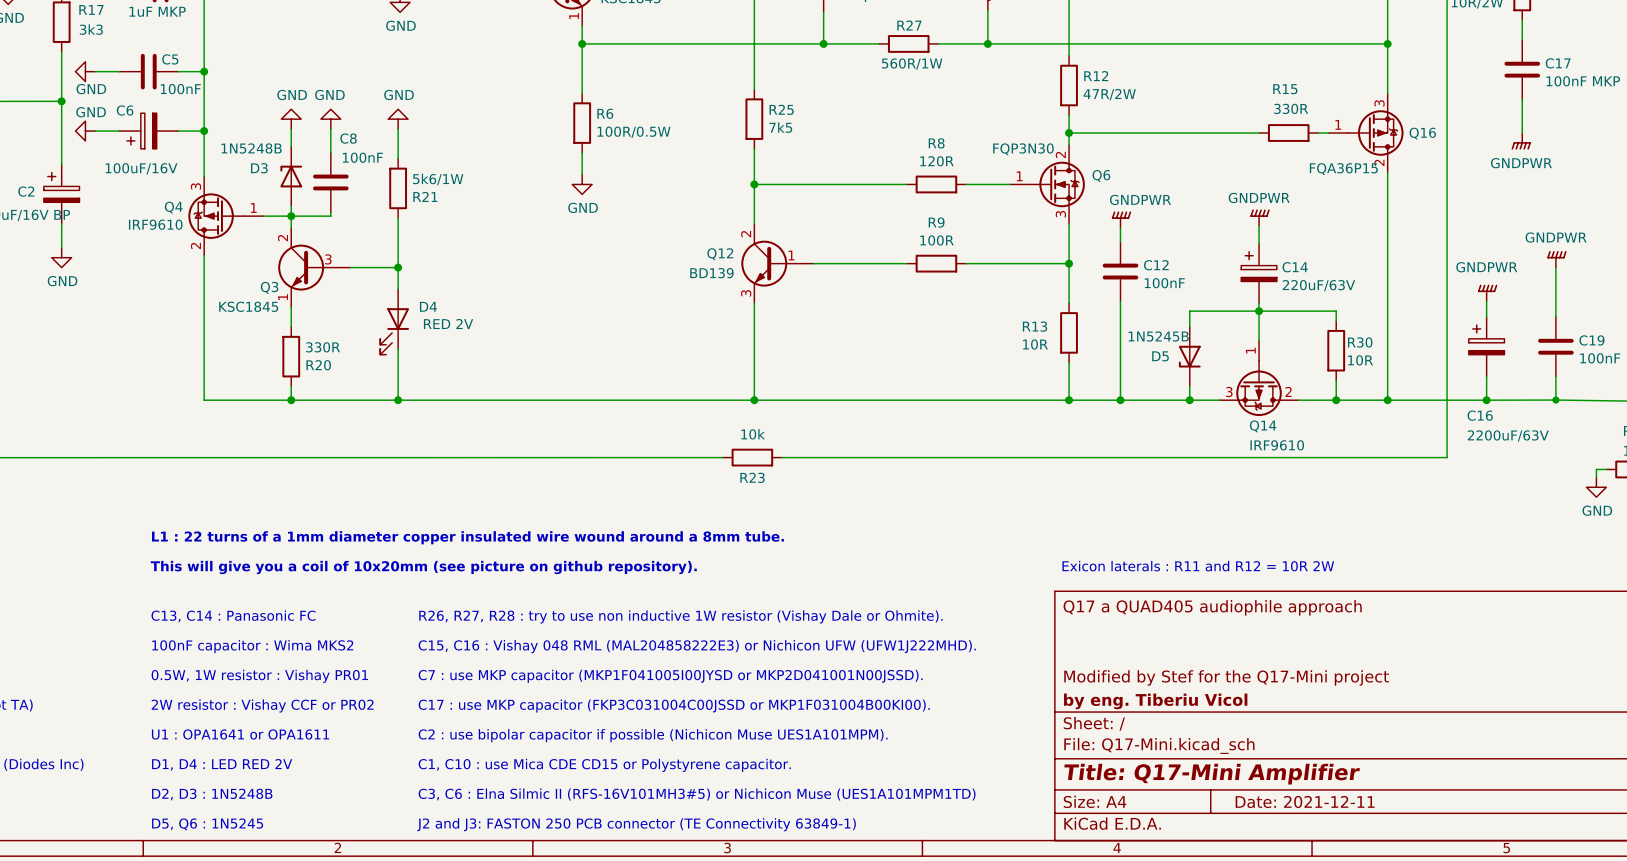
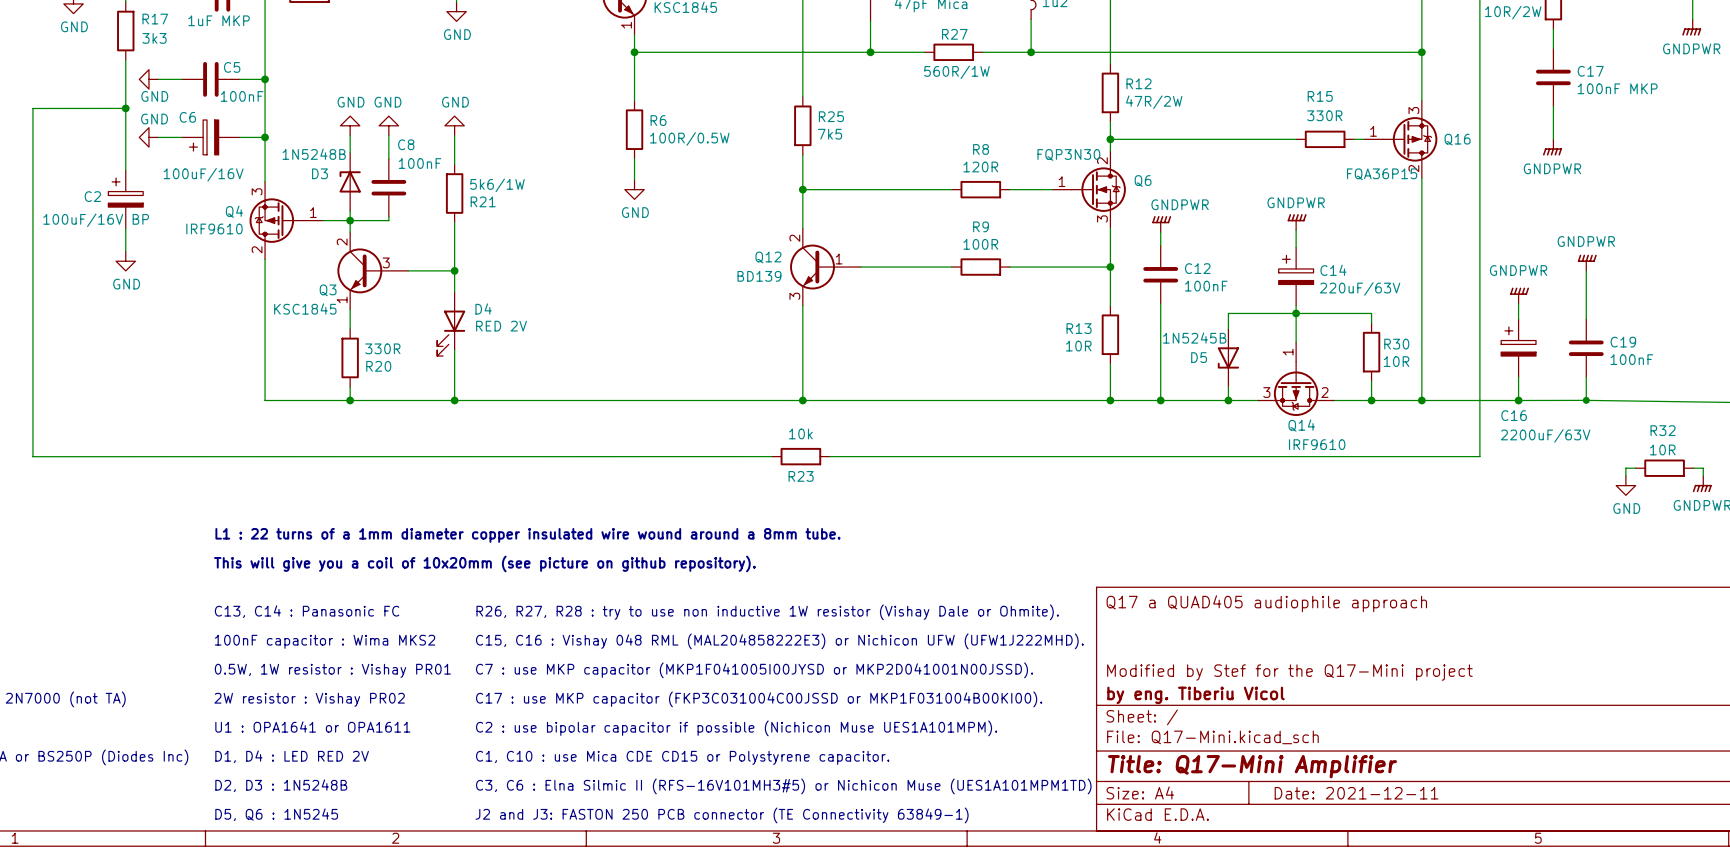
text: Exicon laterals : R11 and R12 = 10R 2W (1198, 566) -> none
text: 2W resistor : Vishay CCF or PR02 (262, 705) -> 2W resistor : Vishay PR02 (309, 699)

